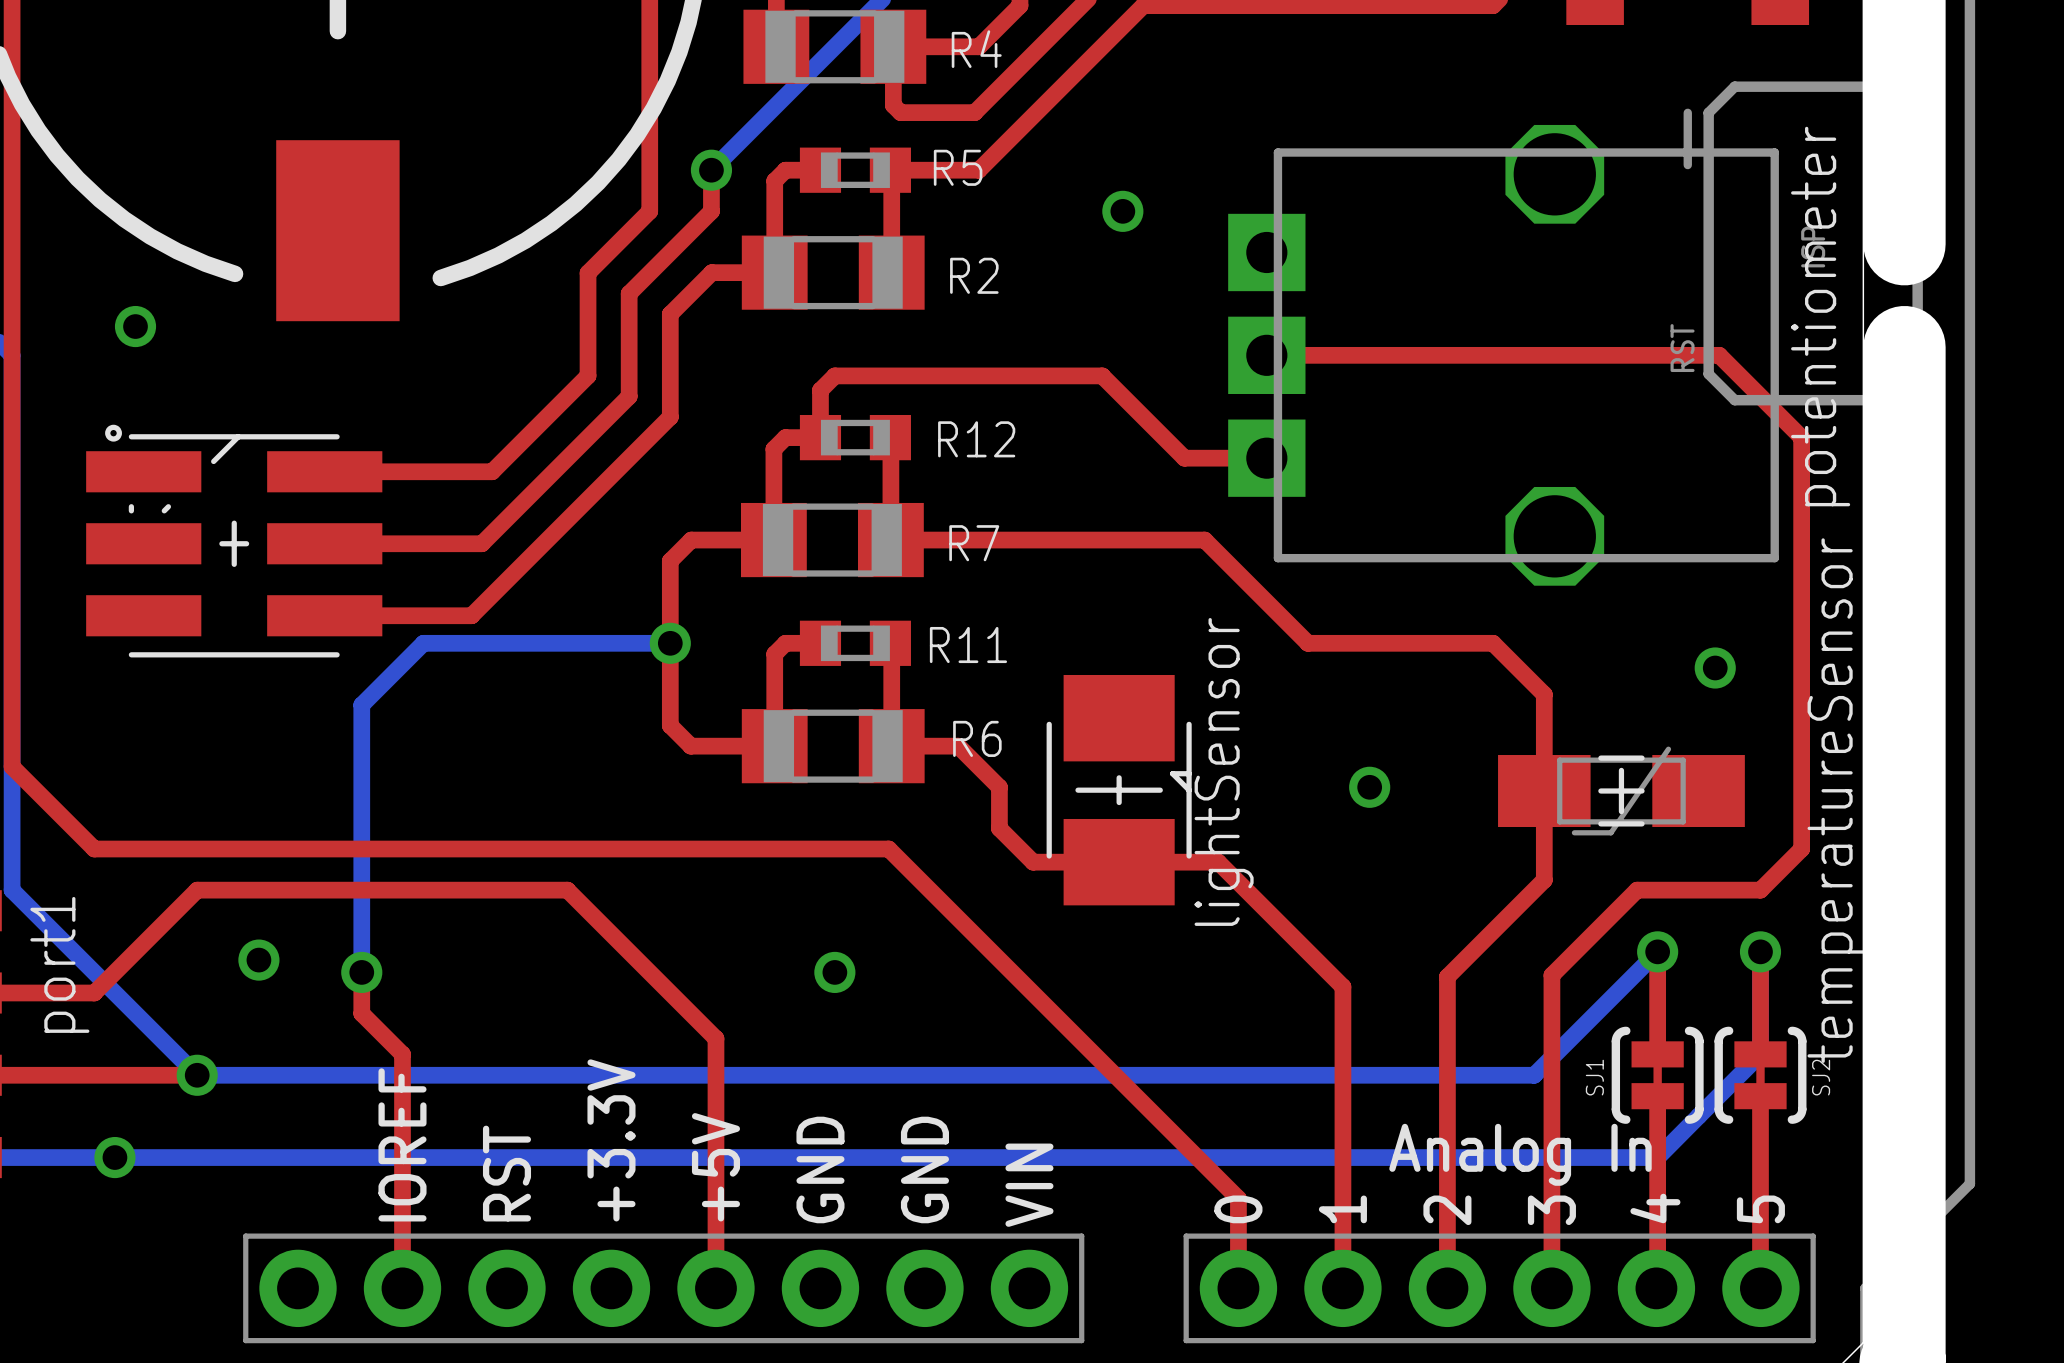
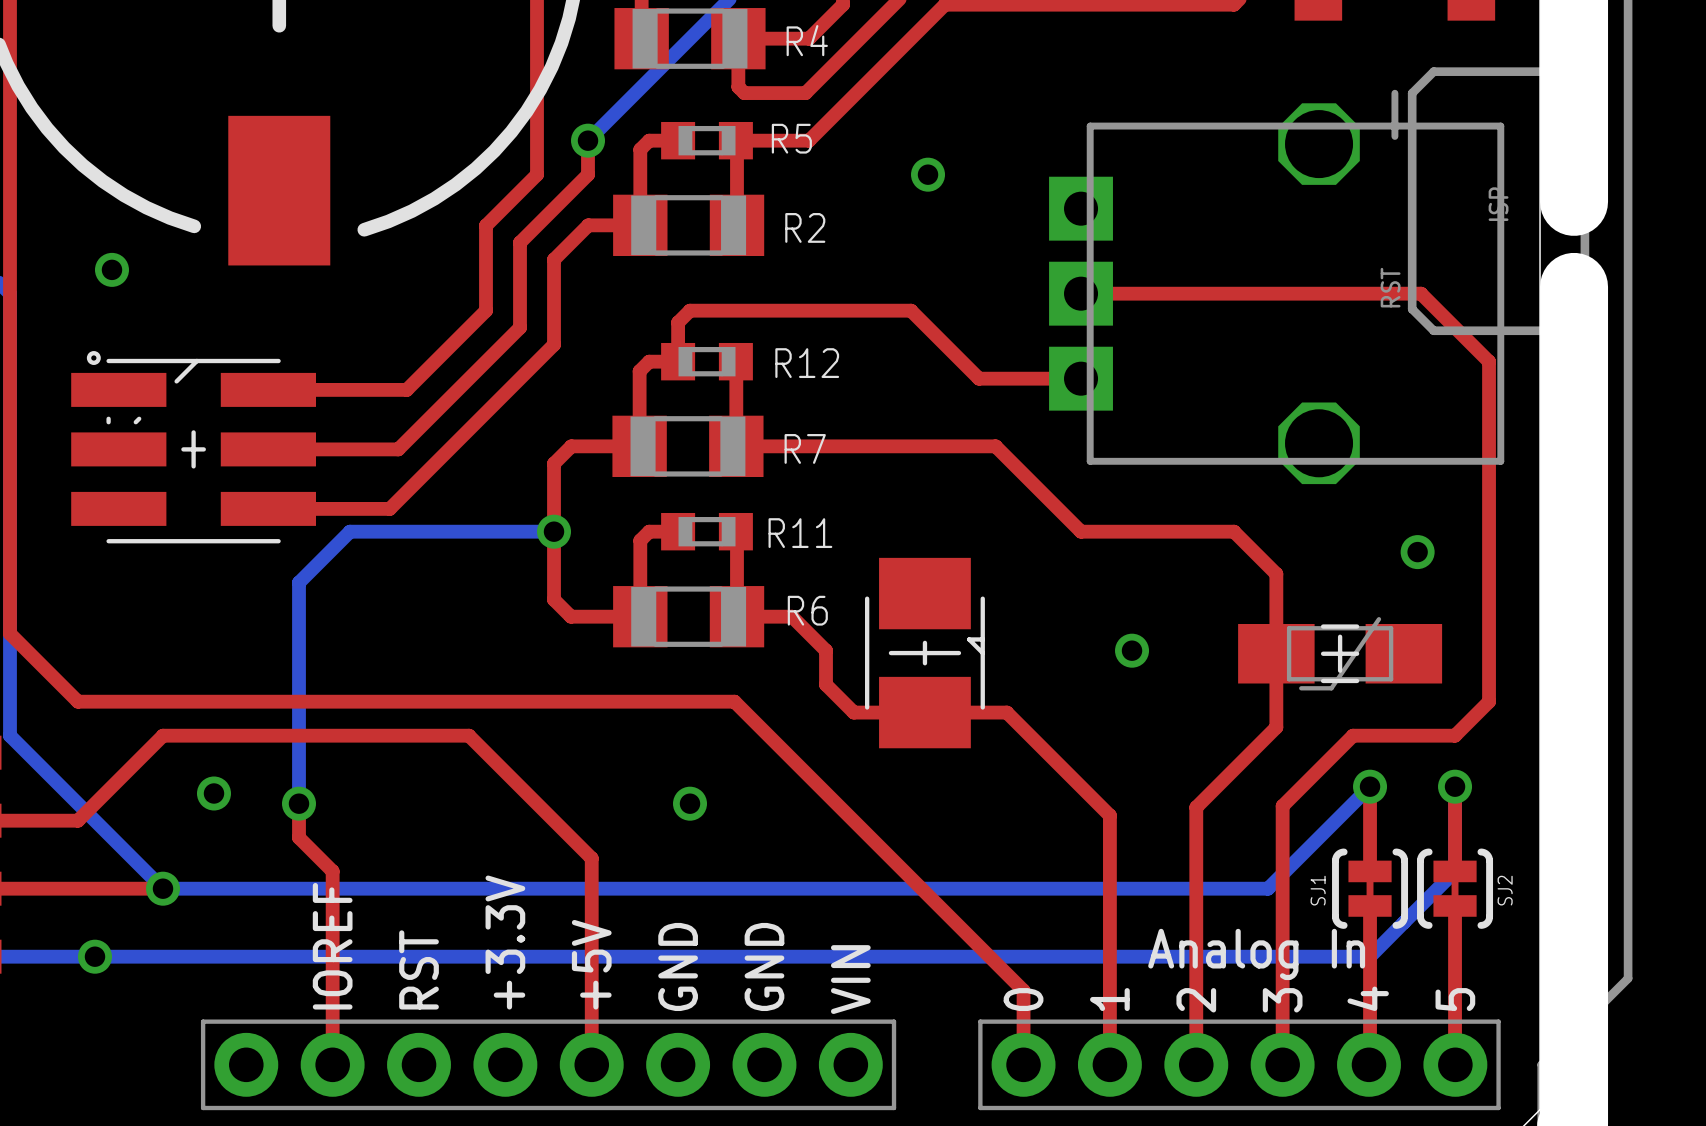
text: potentiometer (1820, 316) -> none
part position: (1503, 355) -> (1276, 293)
text: lightSensor (1224, 771) -> none
text: temperatureSensor (1837, 800) -> none
text: port1 (59, 964) -> none

